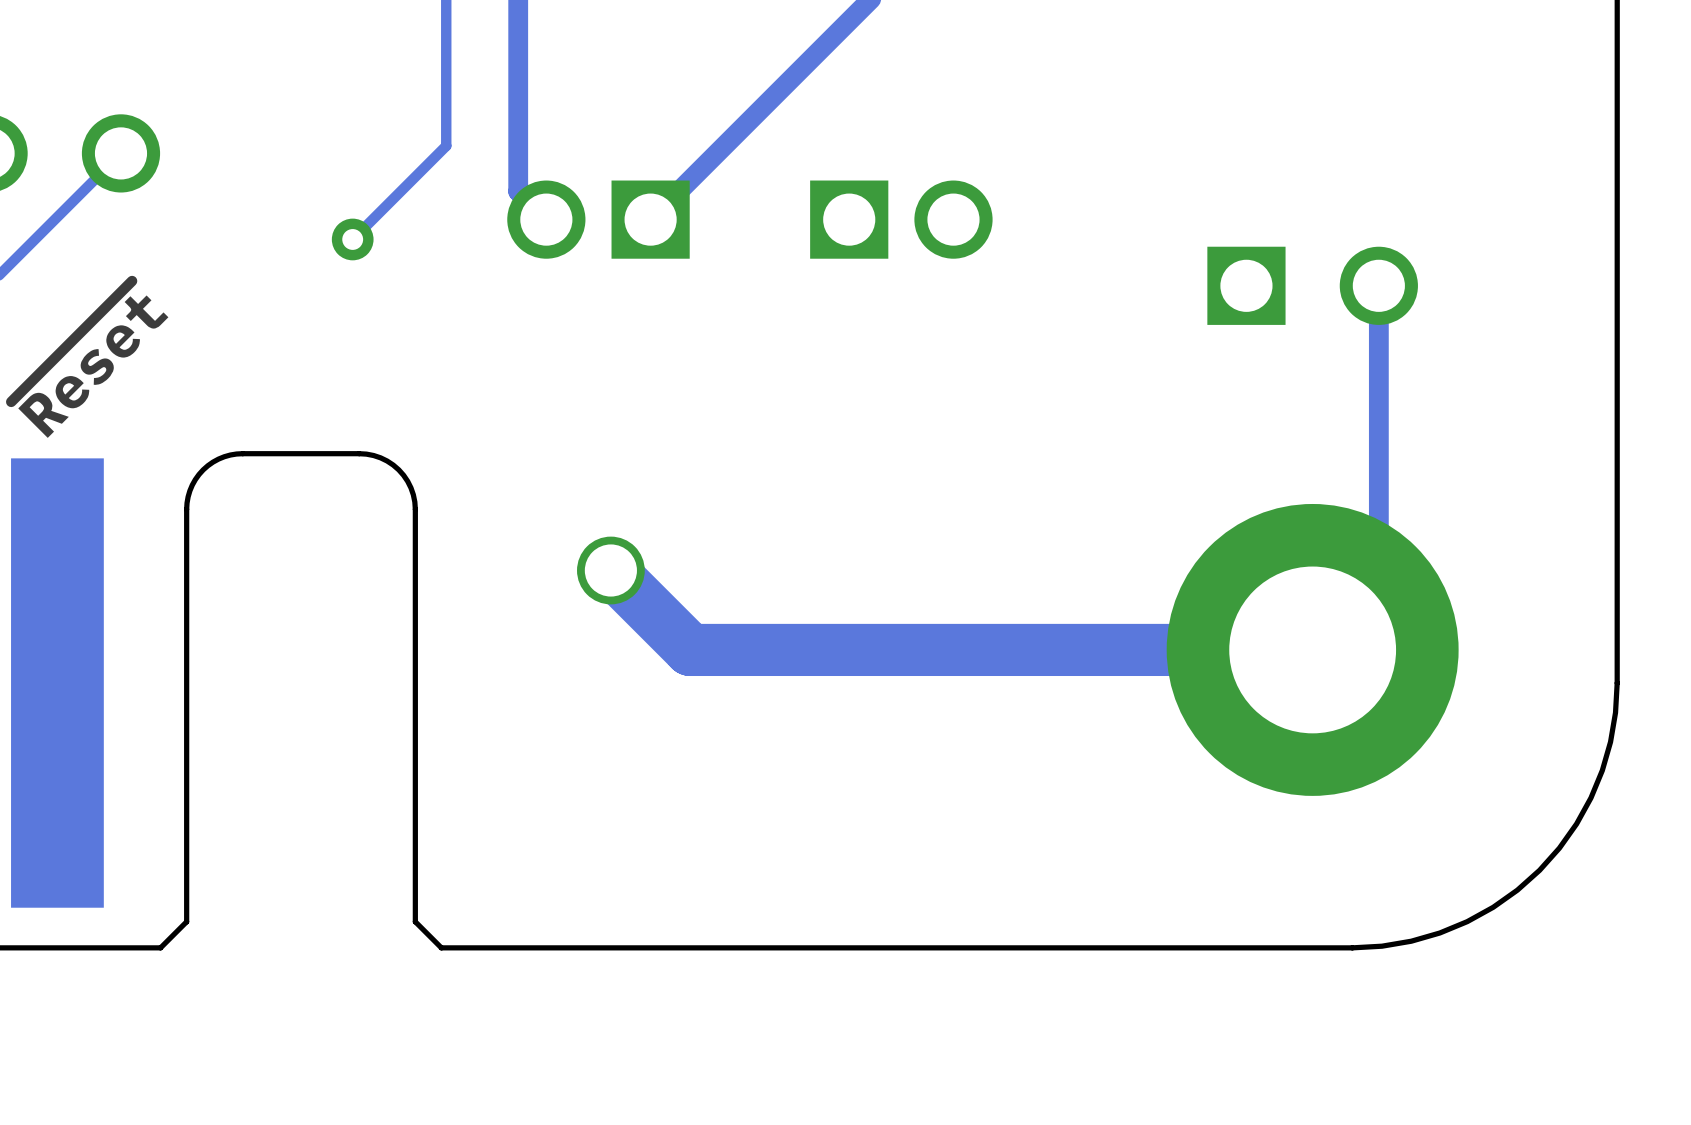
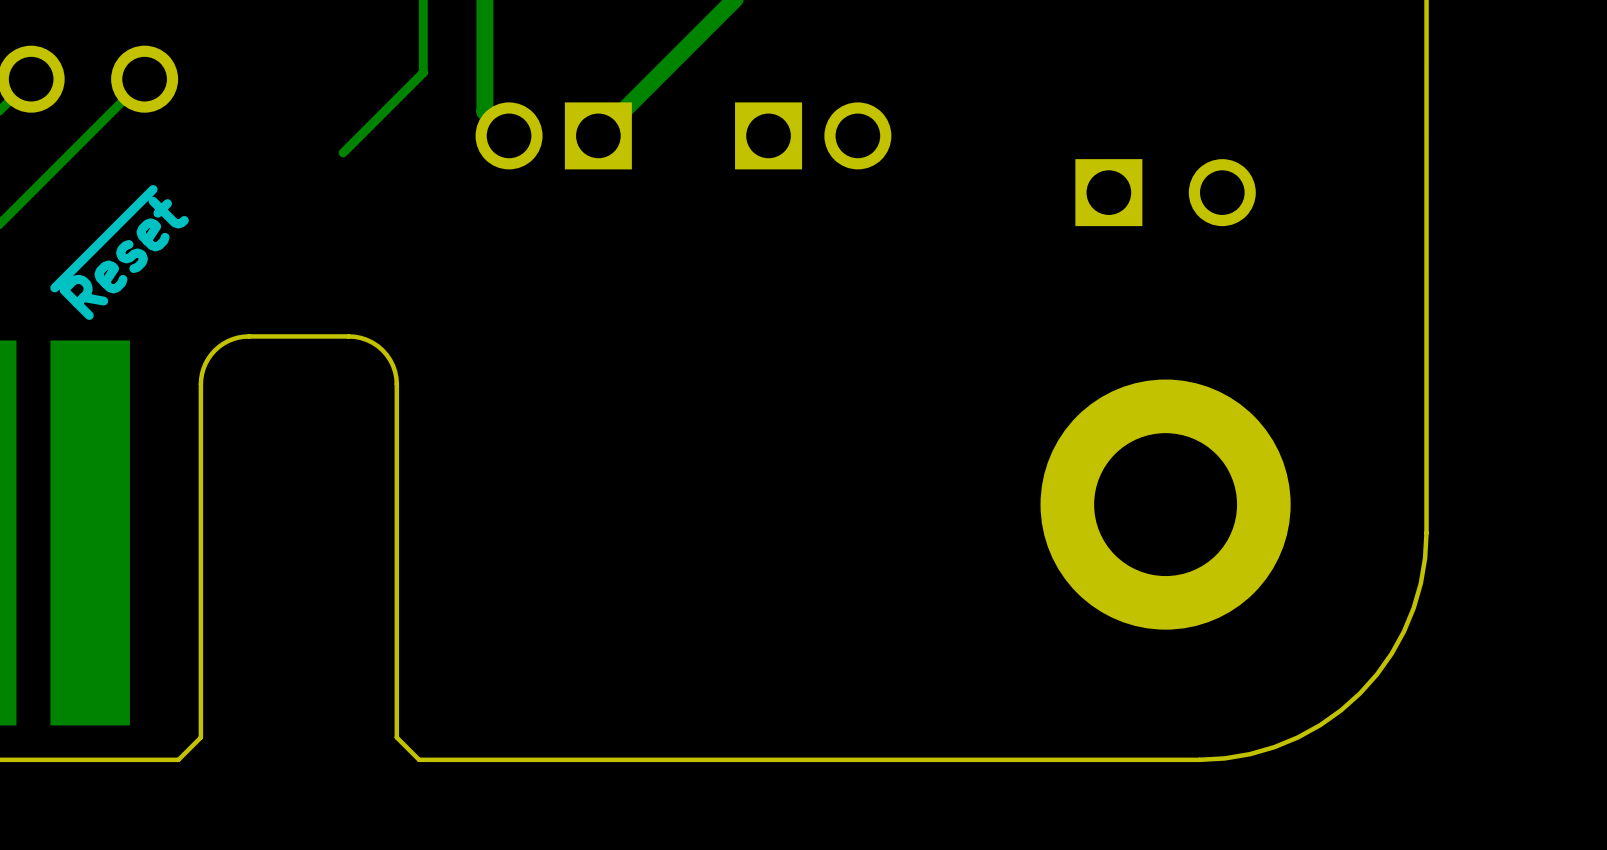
via: (352, 239) -> none
track: (1378, 285) (1378, 583) -> none
track: (610, 570) (690, 649) (1312, 649) -> none
via: (610, 570) -> none

